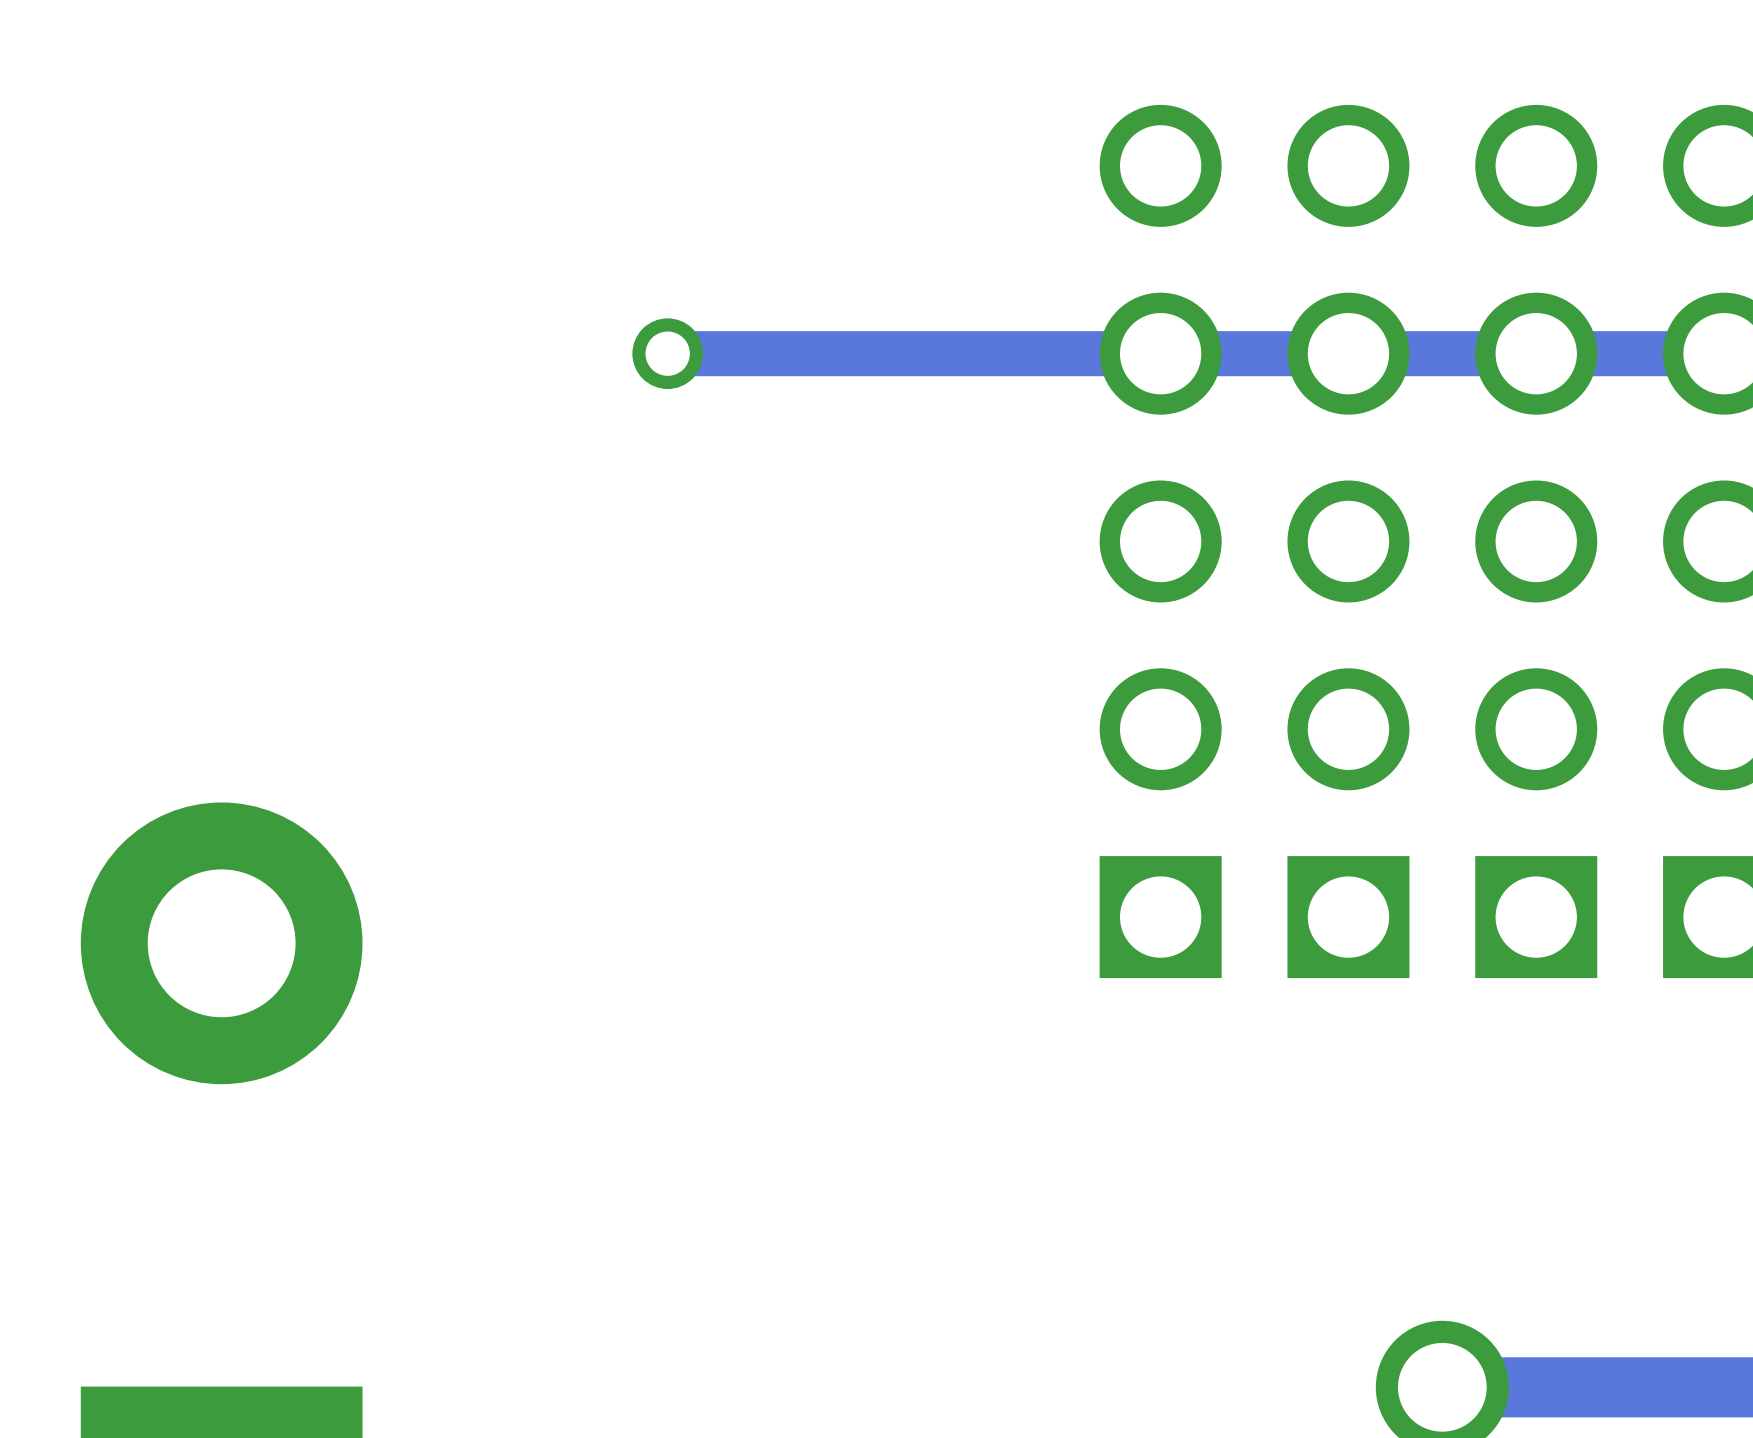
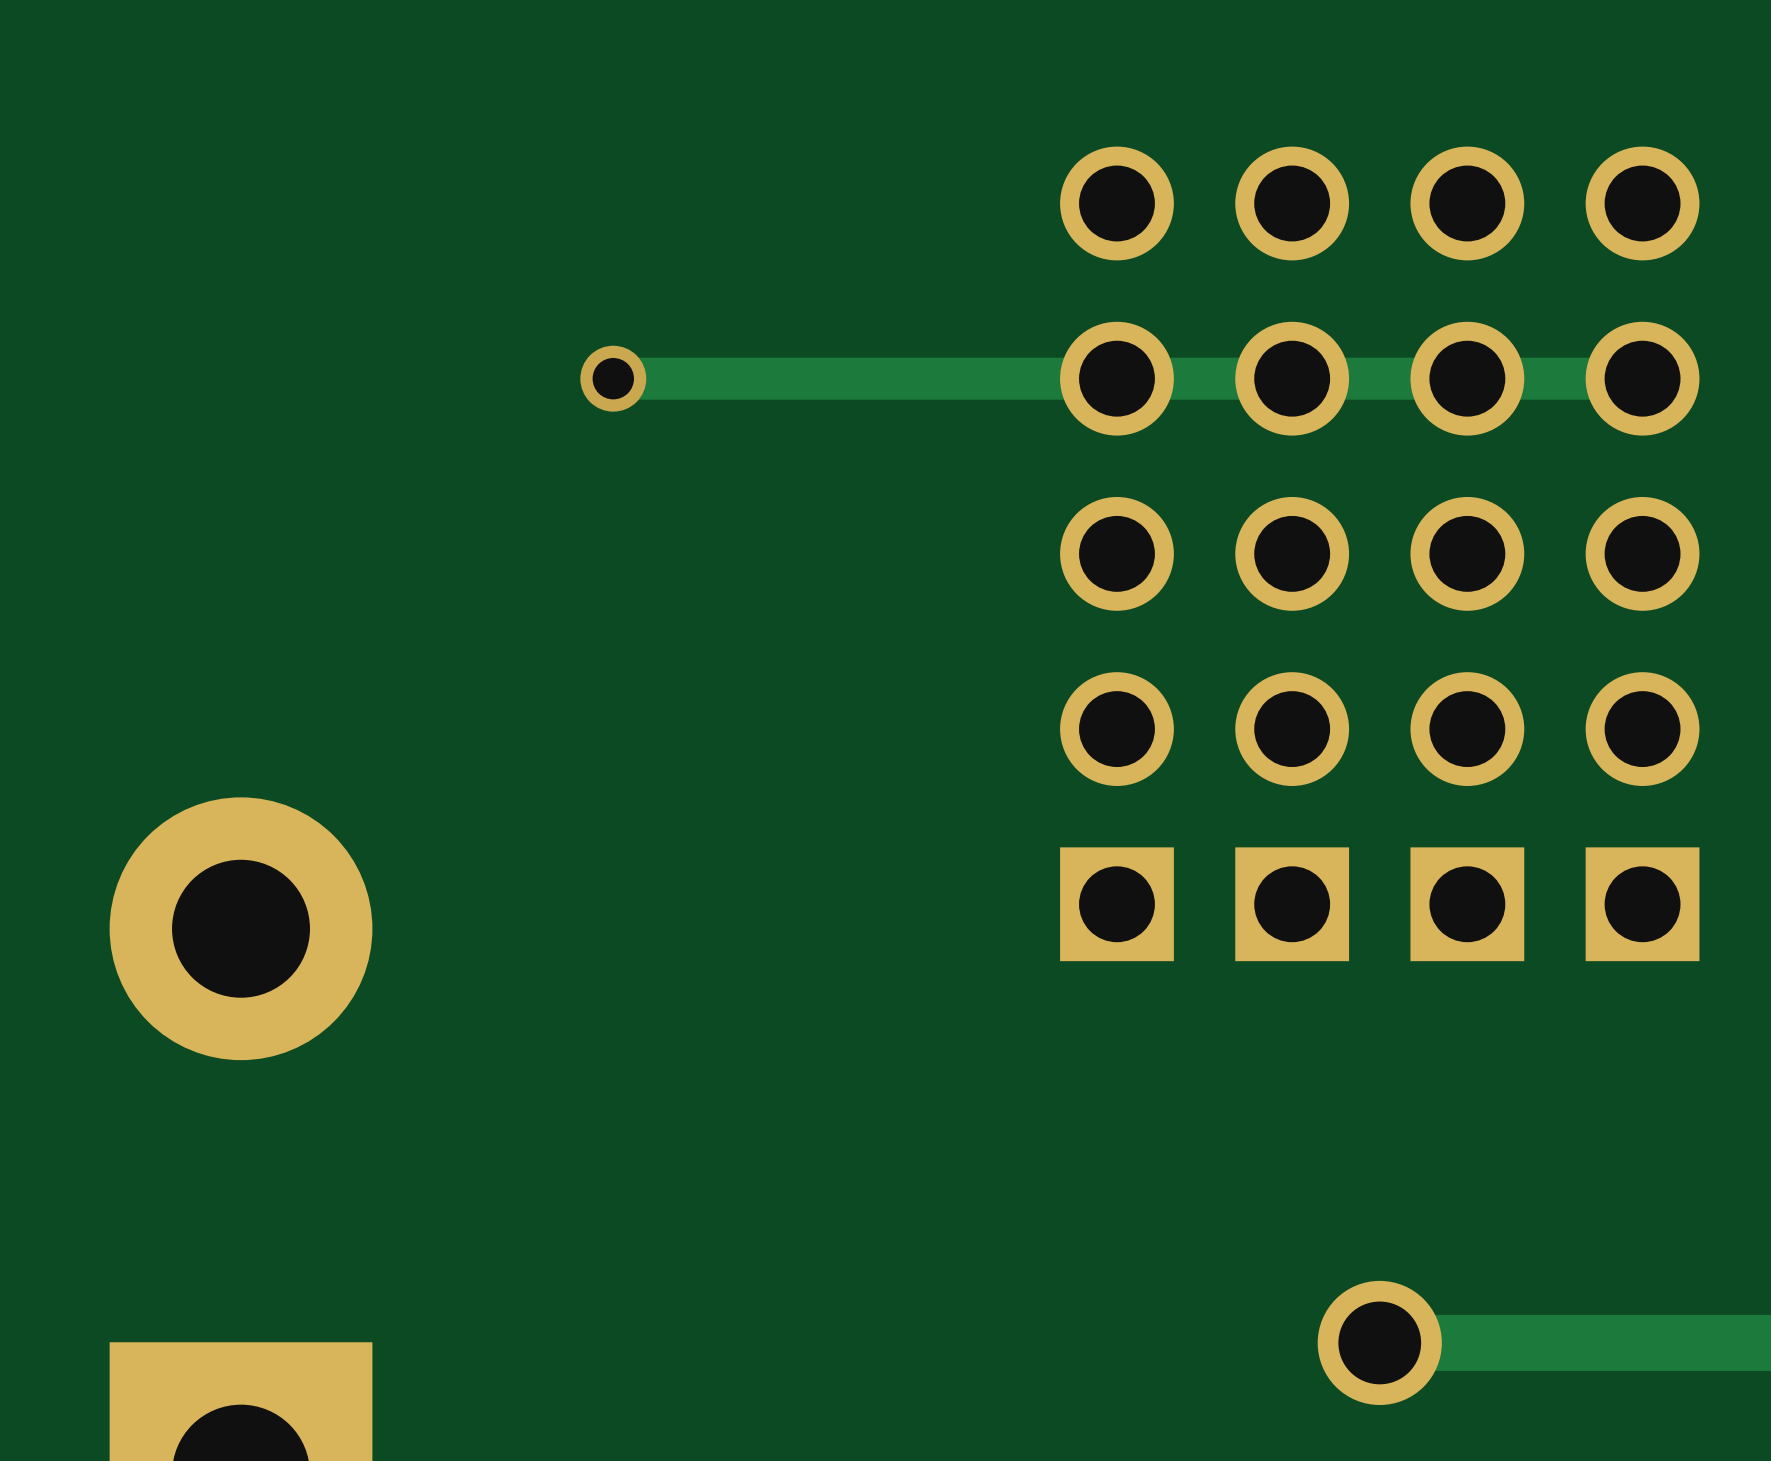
via position: (667, 353) -> (613, 378)

